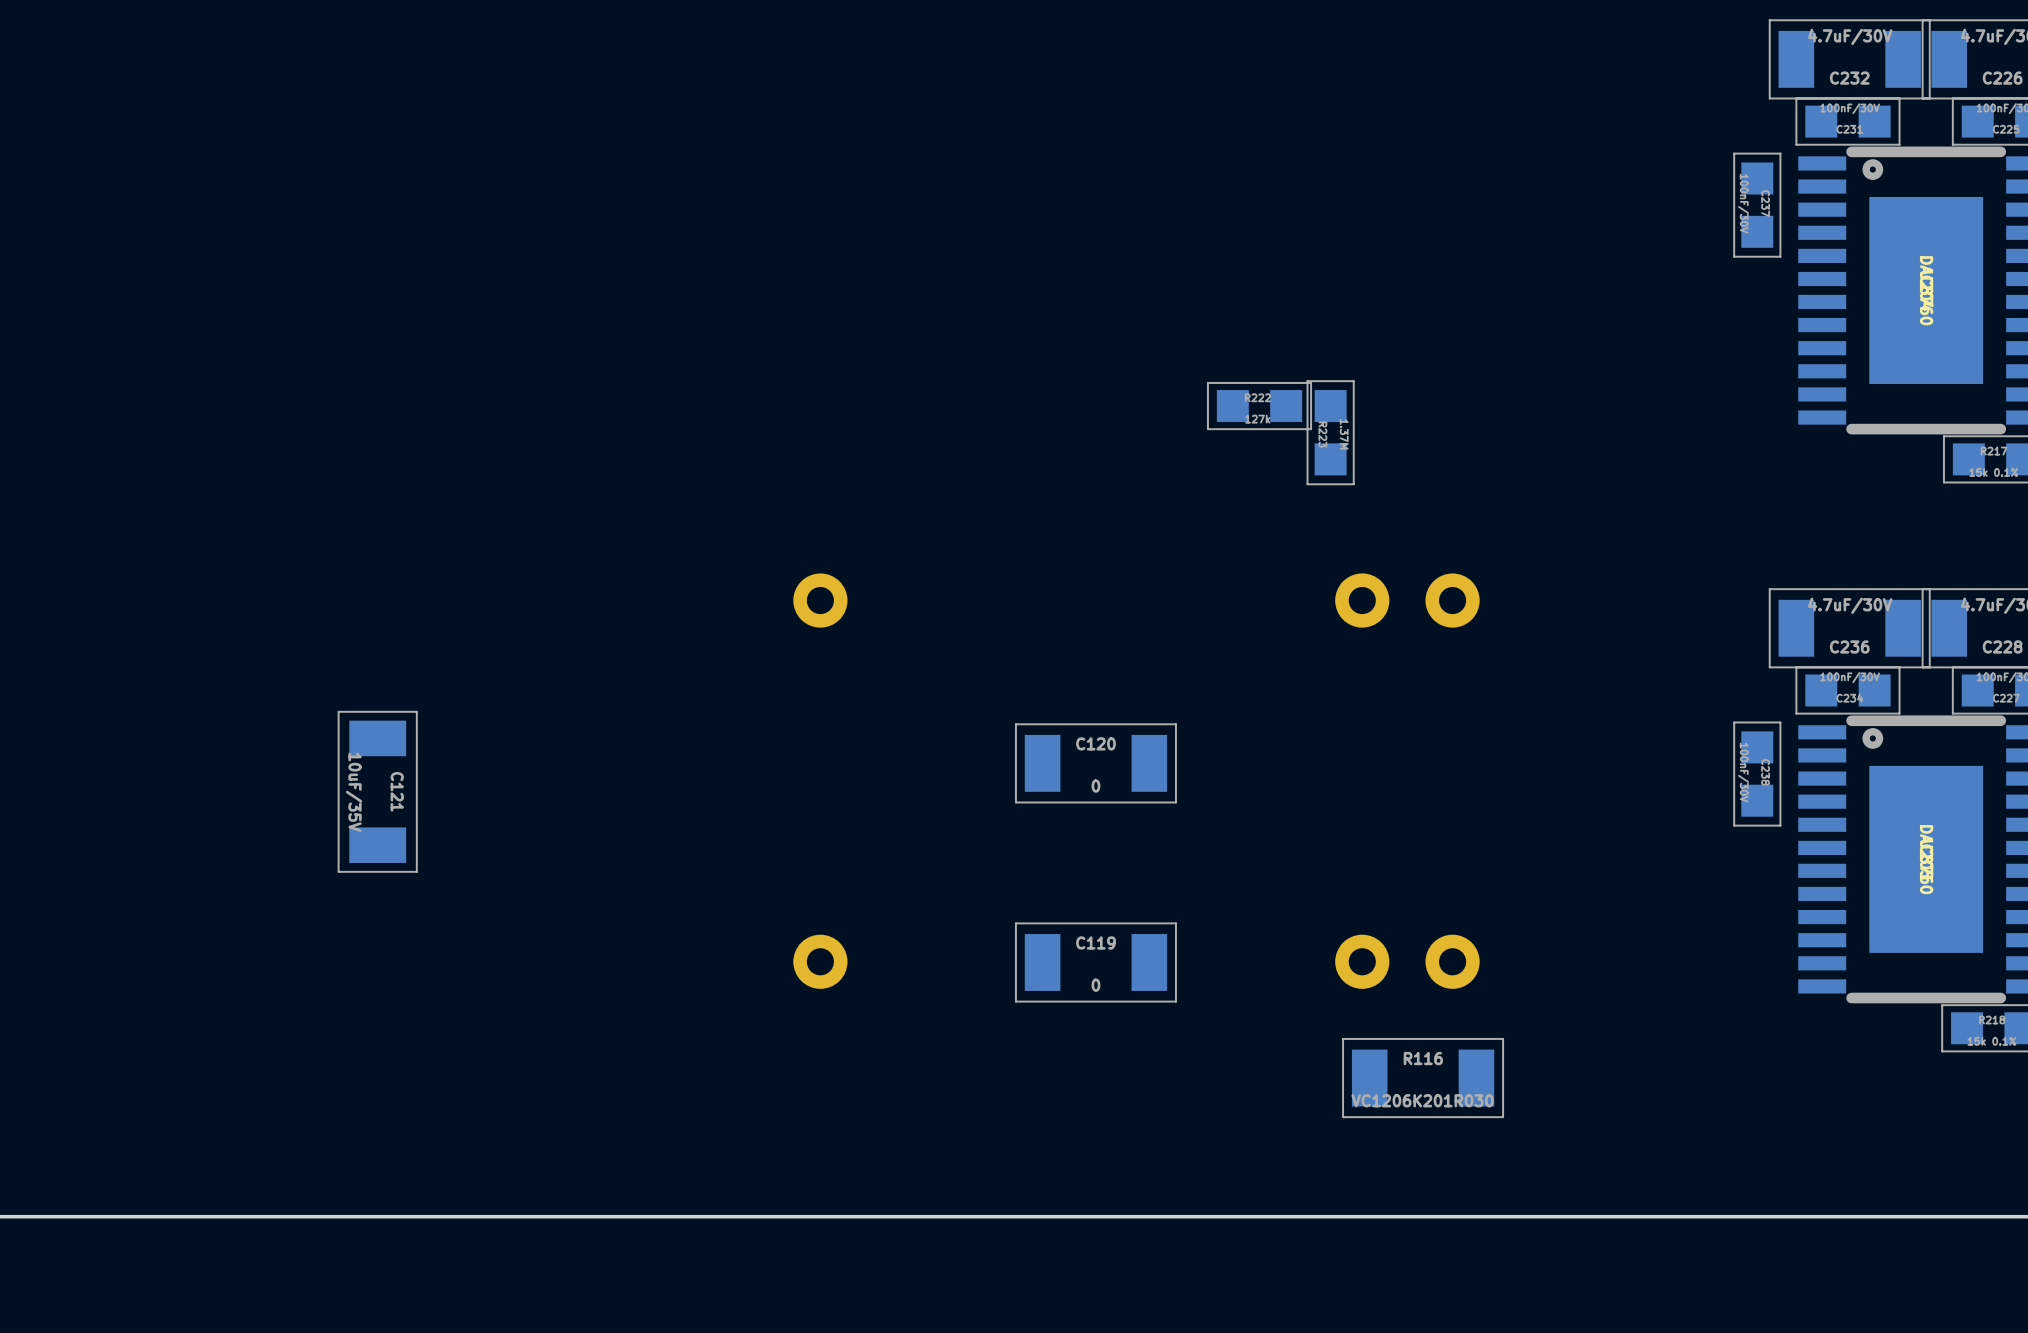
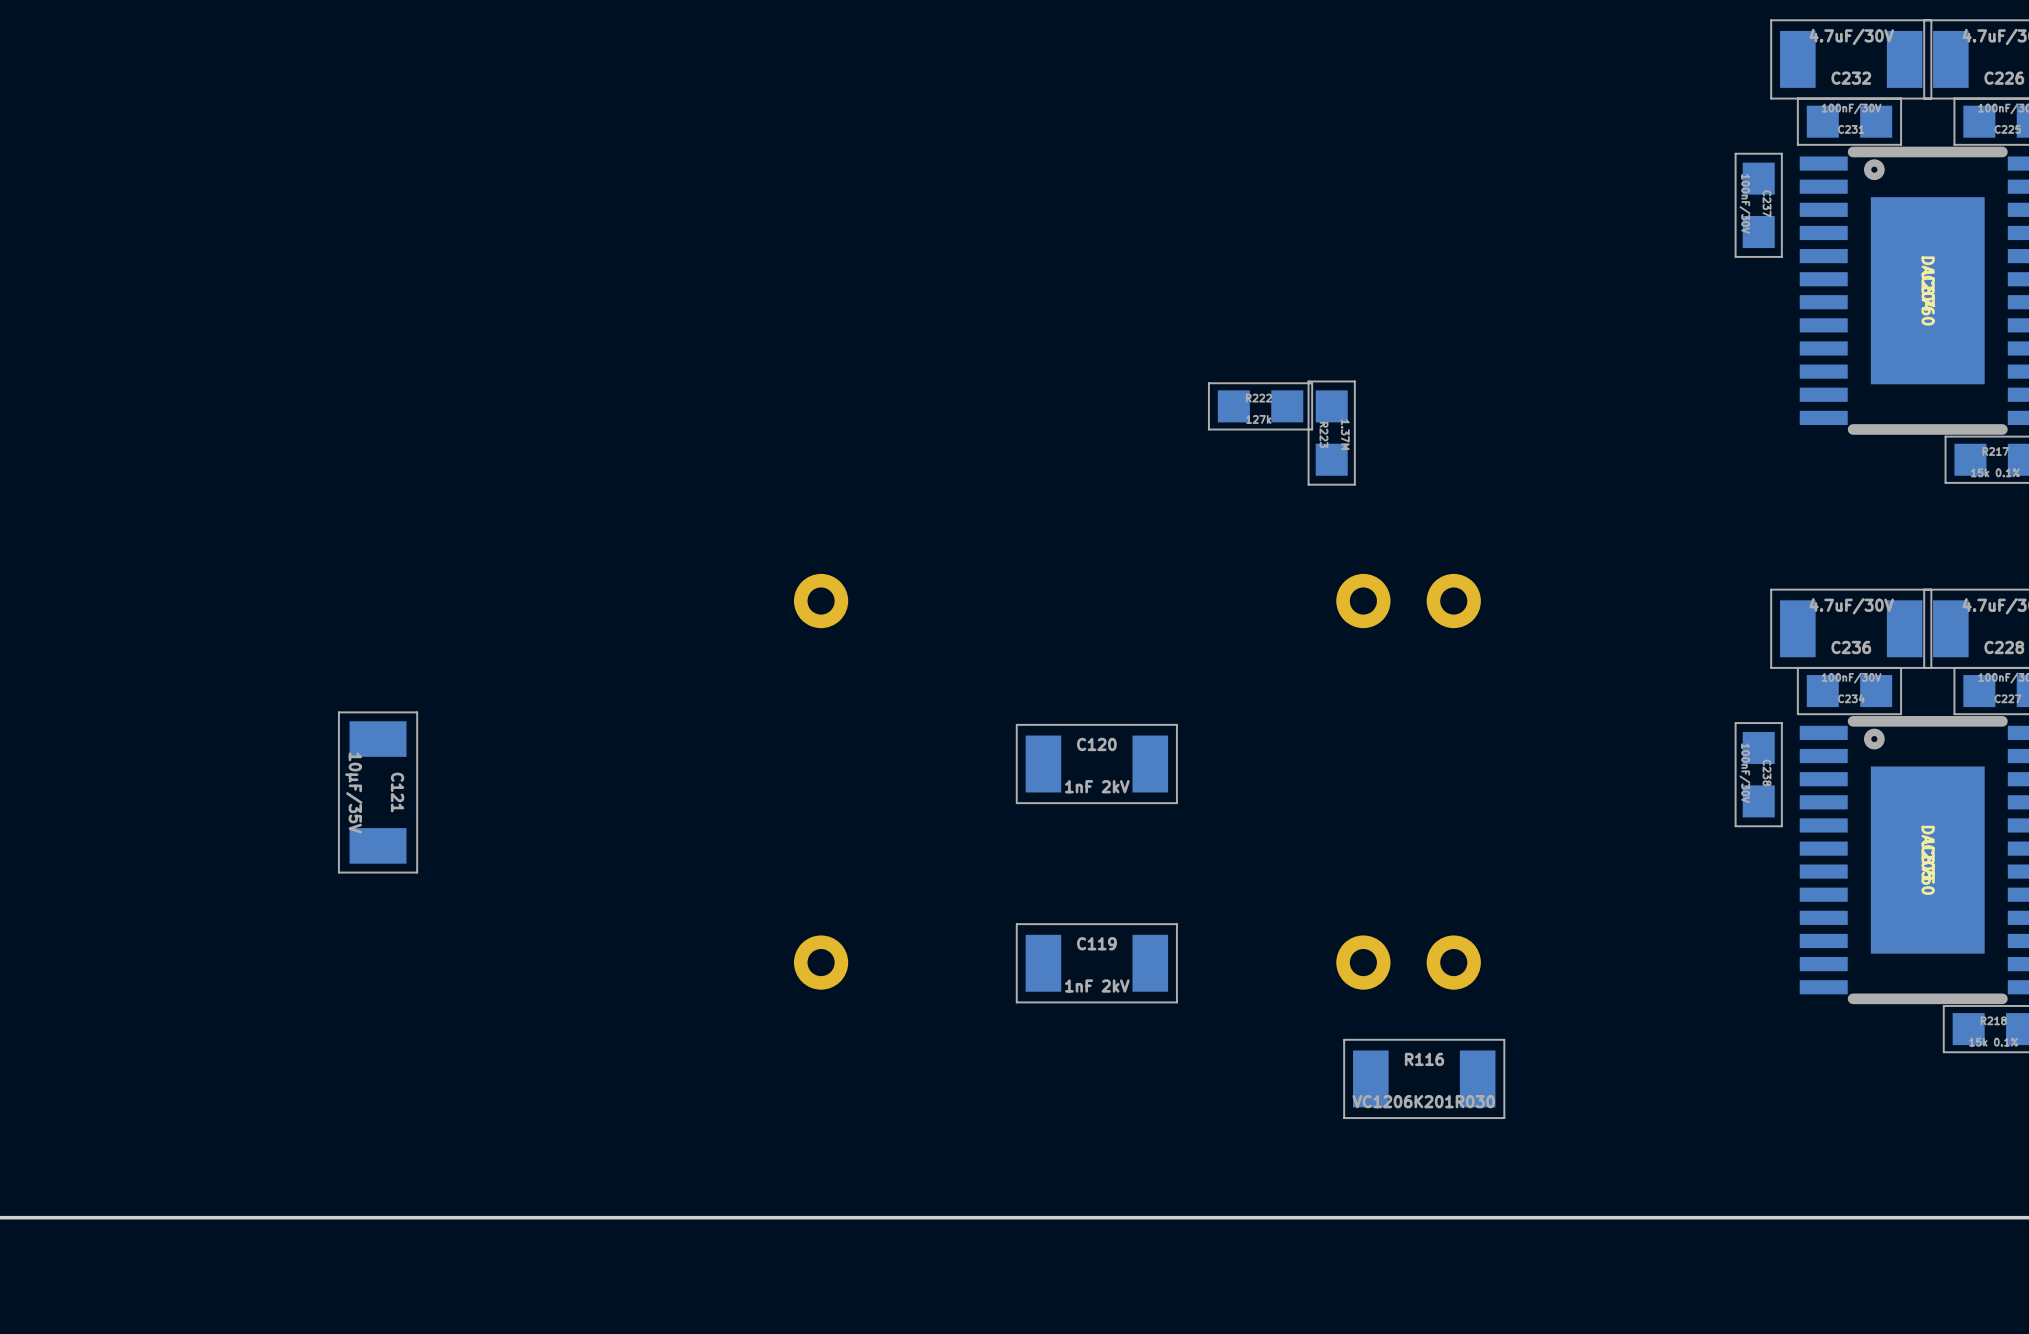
C120 value: 0 (1095, 786) -> 1nF 2kV (1097, 786)
C121 value: 10uF/35V (354, 792) -> 10µF/35V (353, 792)
C119 value: 0 (1095, 985) -> 1nF 2kV (1097, 986)

